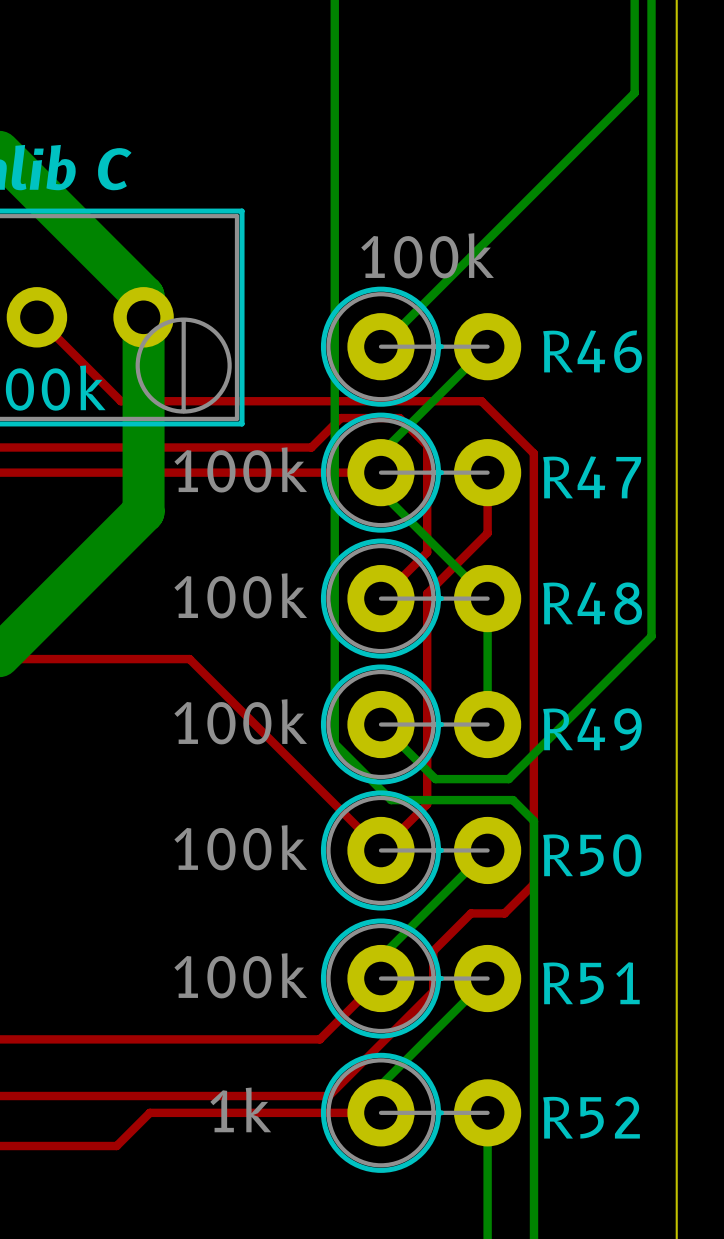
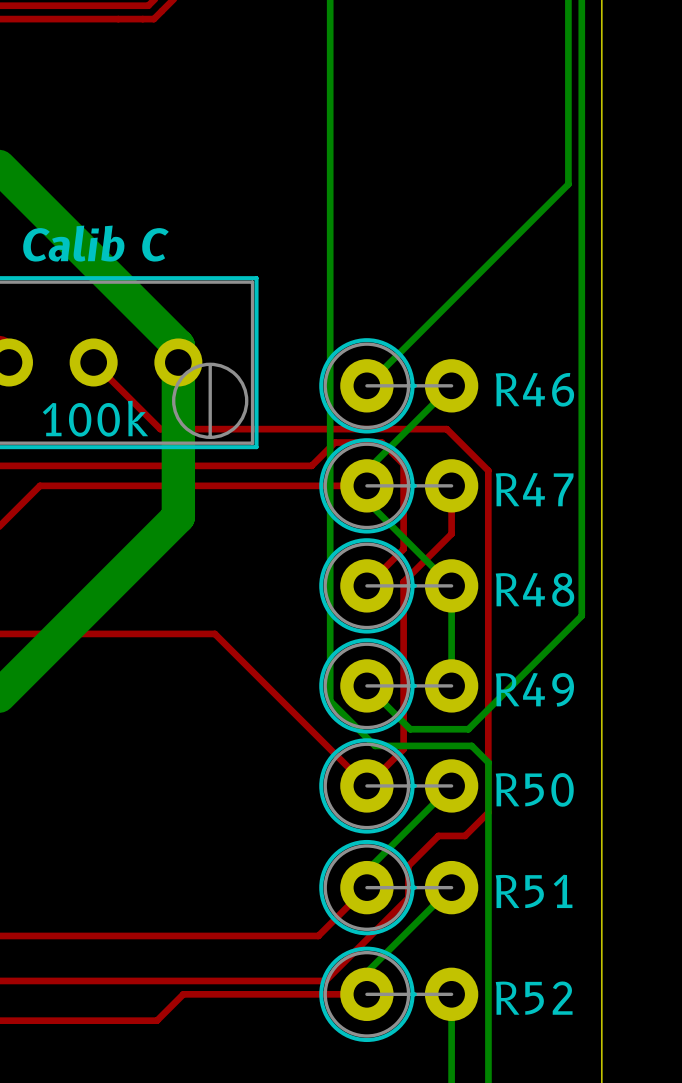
R46 value: 100k (427, 255) -> none
R47 value: 100k (240, 469) -> none
R48 value: 100k (240, 595) -> none
R49 value: 100k (240, 721) -> none
R50 value: 100k (240, 847) -> none
R51 value: 100k (240, 975) -> none
R52 value: 1k (240, 1109) -> none

